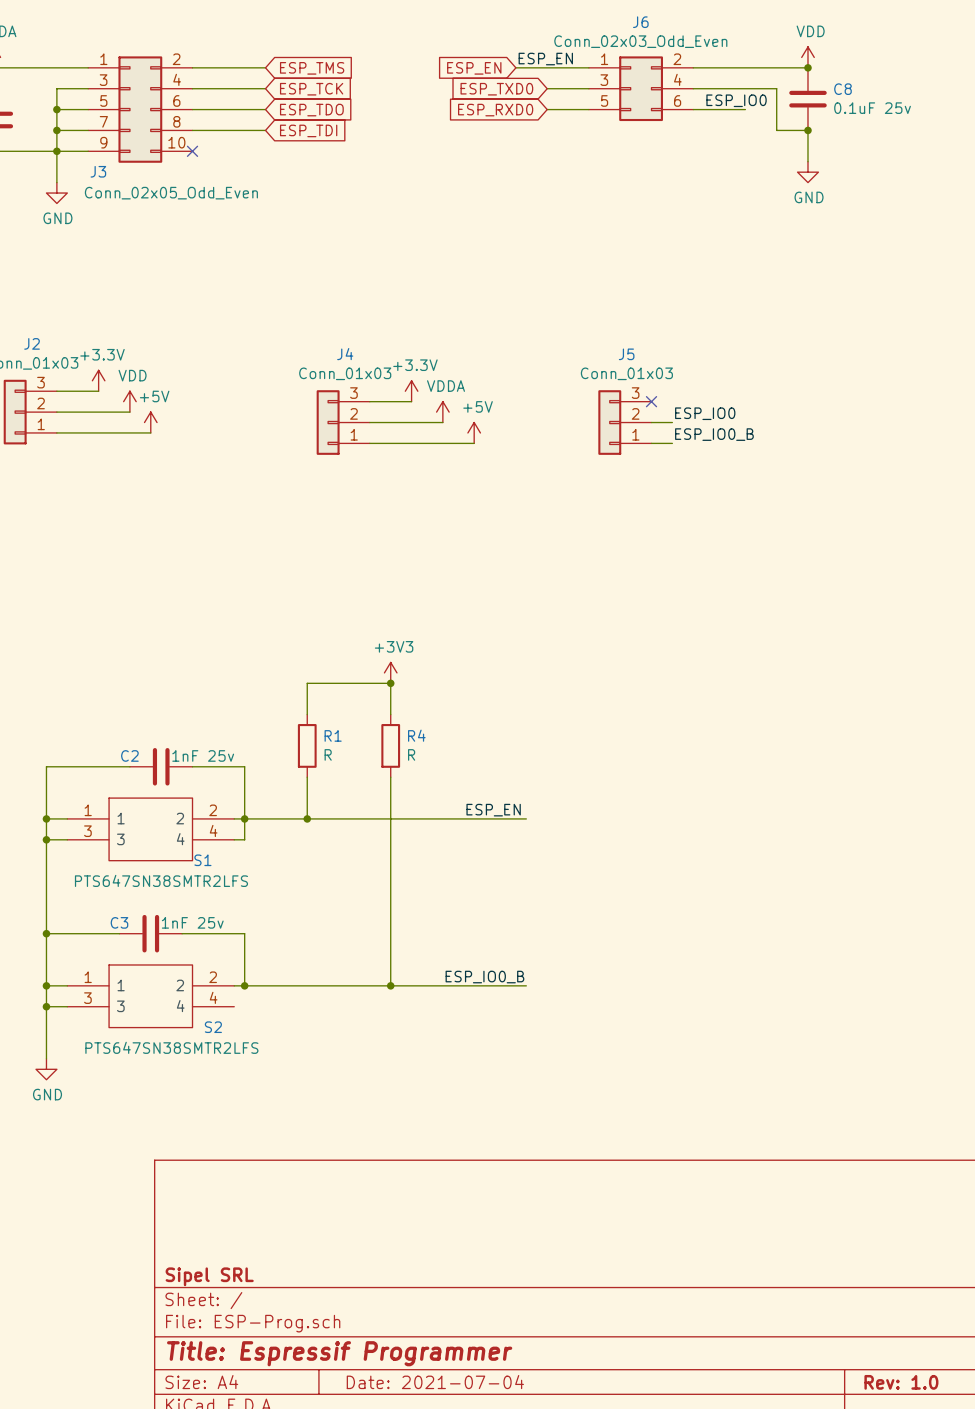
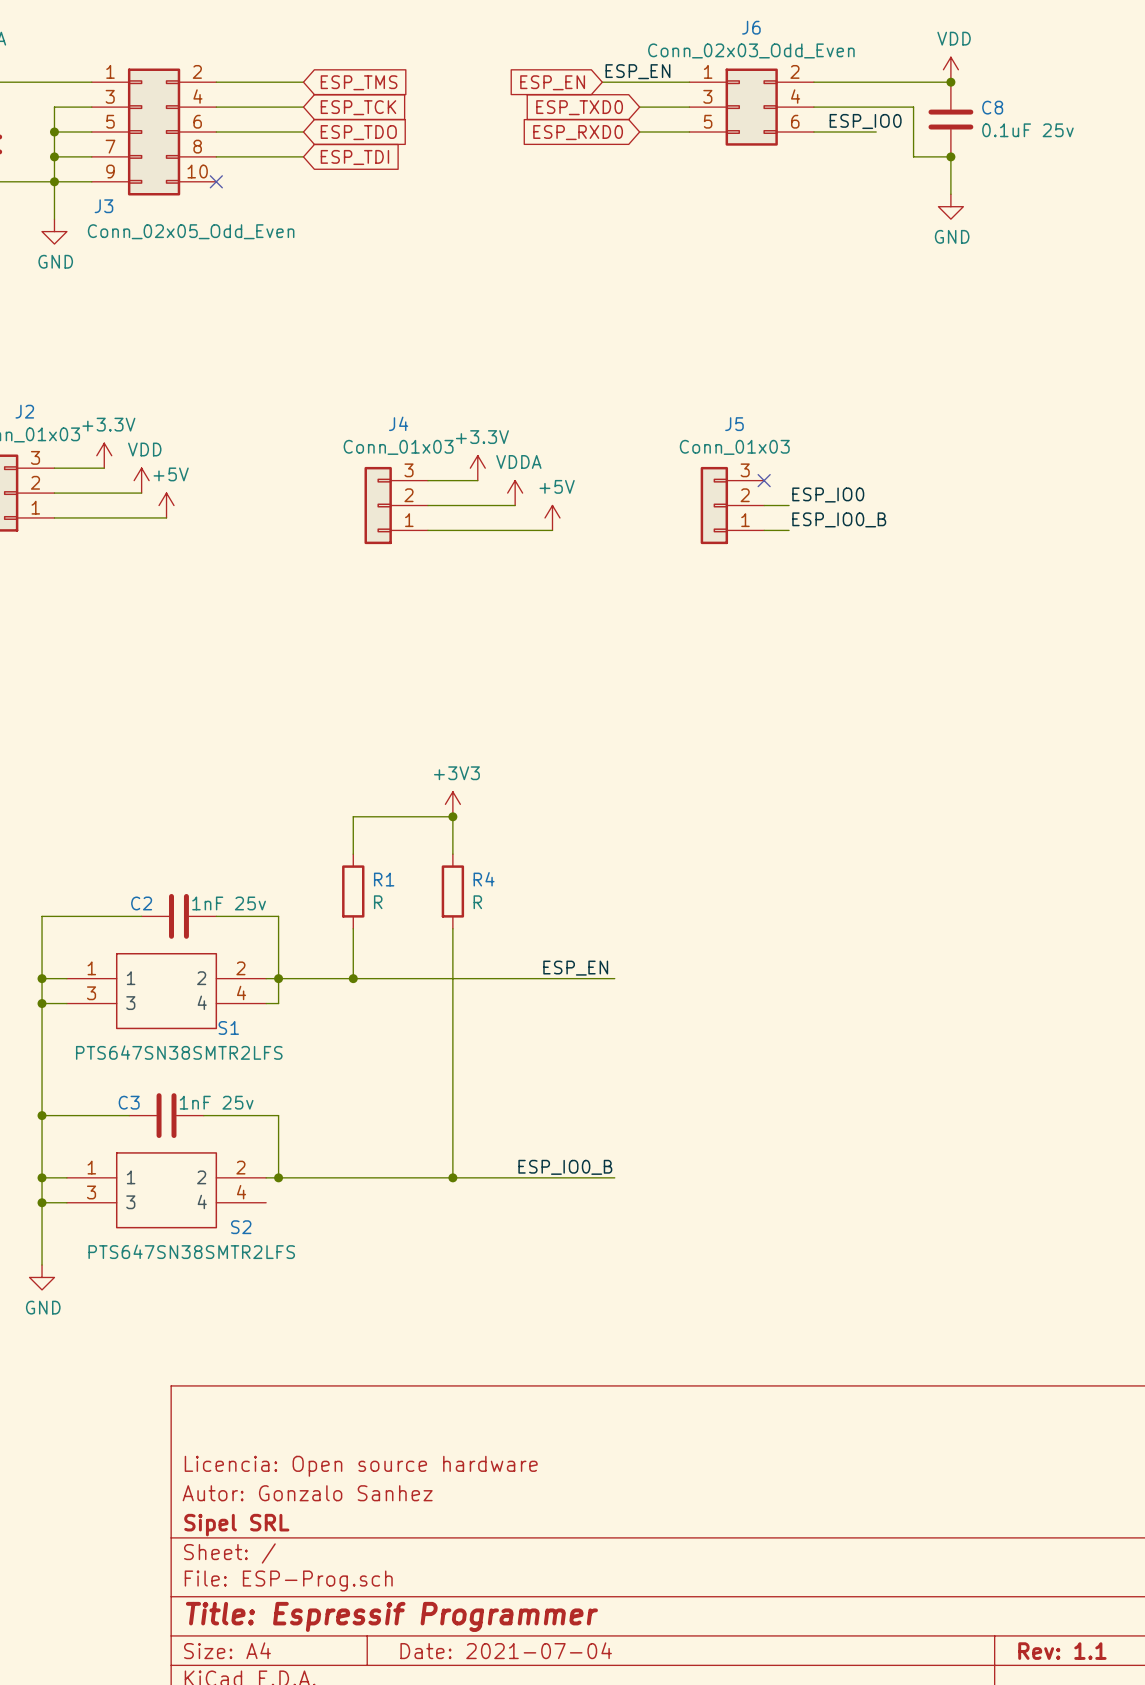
title block: none -> Licencia: Open source hardware (361, 1466)
title block: none -> Autor: Gonzalo Sanhez (307, 1493)
title block: Rev: 1.0 (901, 1382) -> Rev: 1.1 (1062, 1651)

